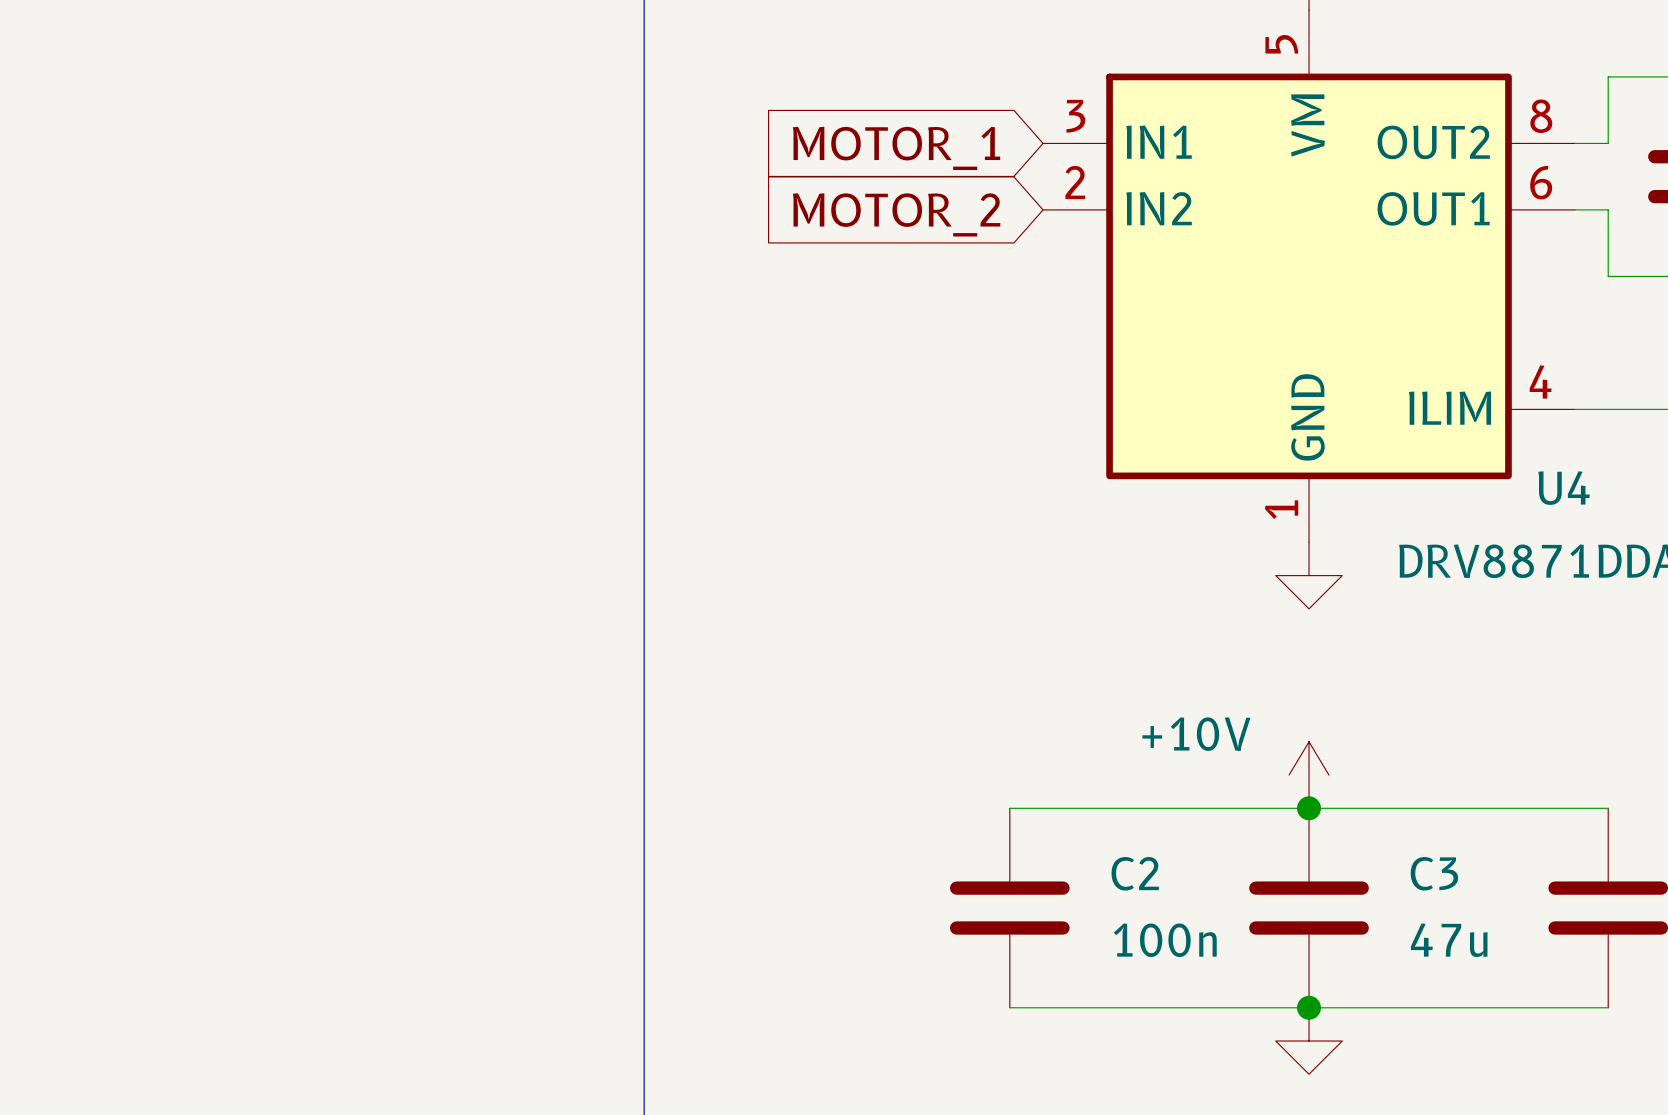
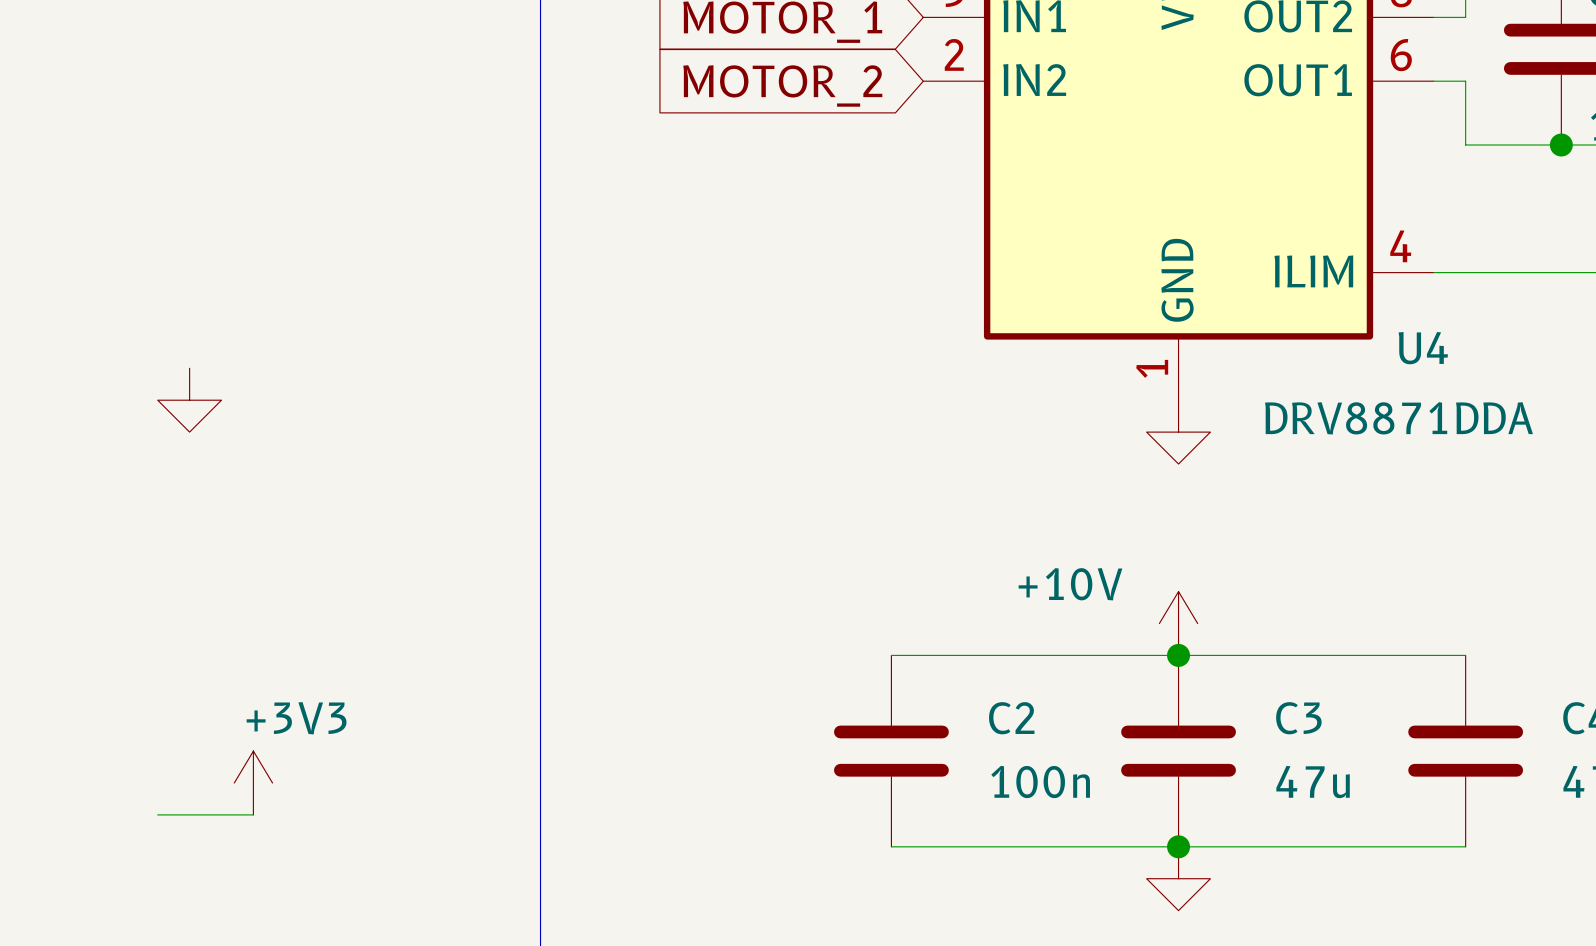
power symbol: none -> (189, 400)
power symbol: none -> +3V3 (253, 783)
wire: none -> (157, 814) (253, 814)

